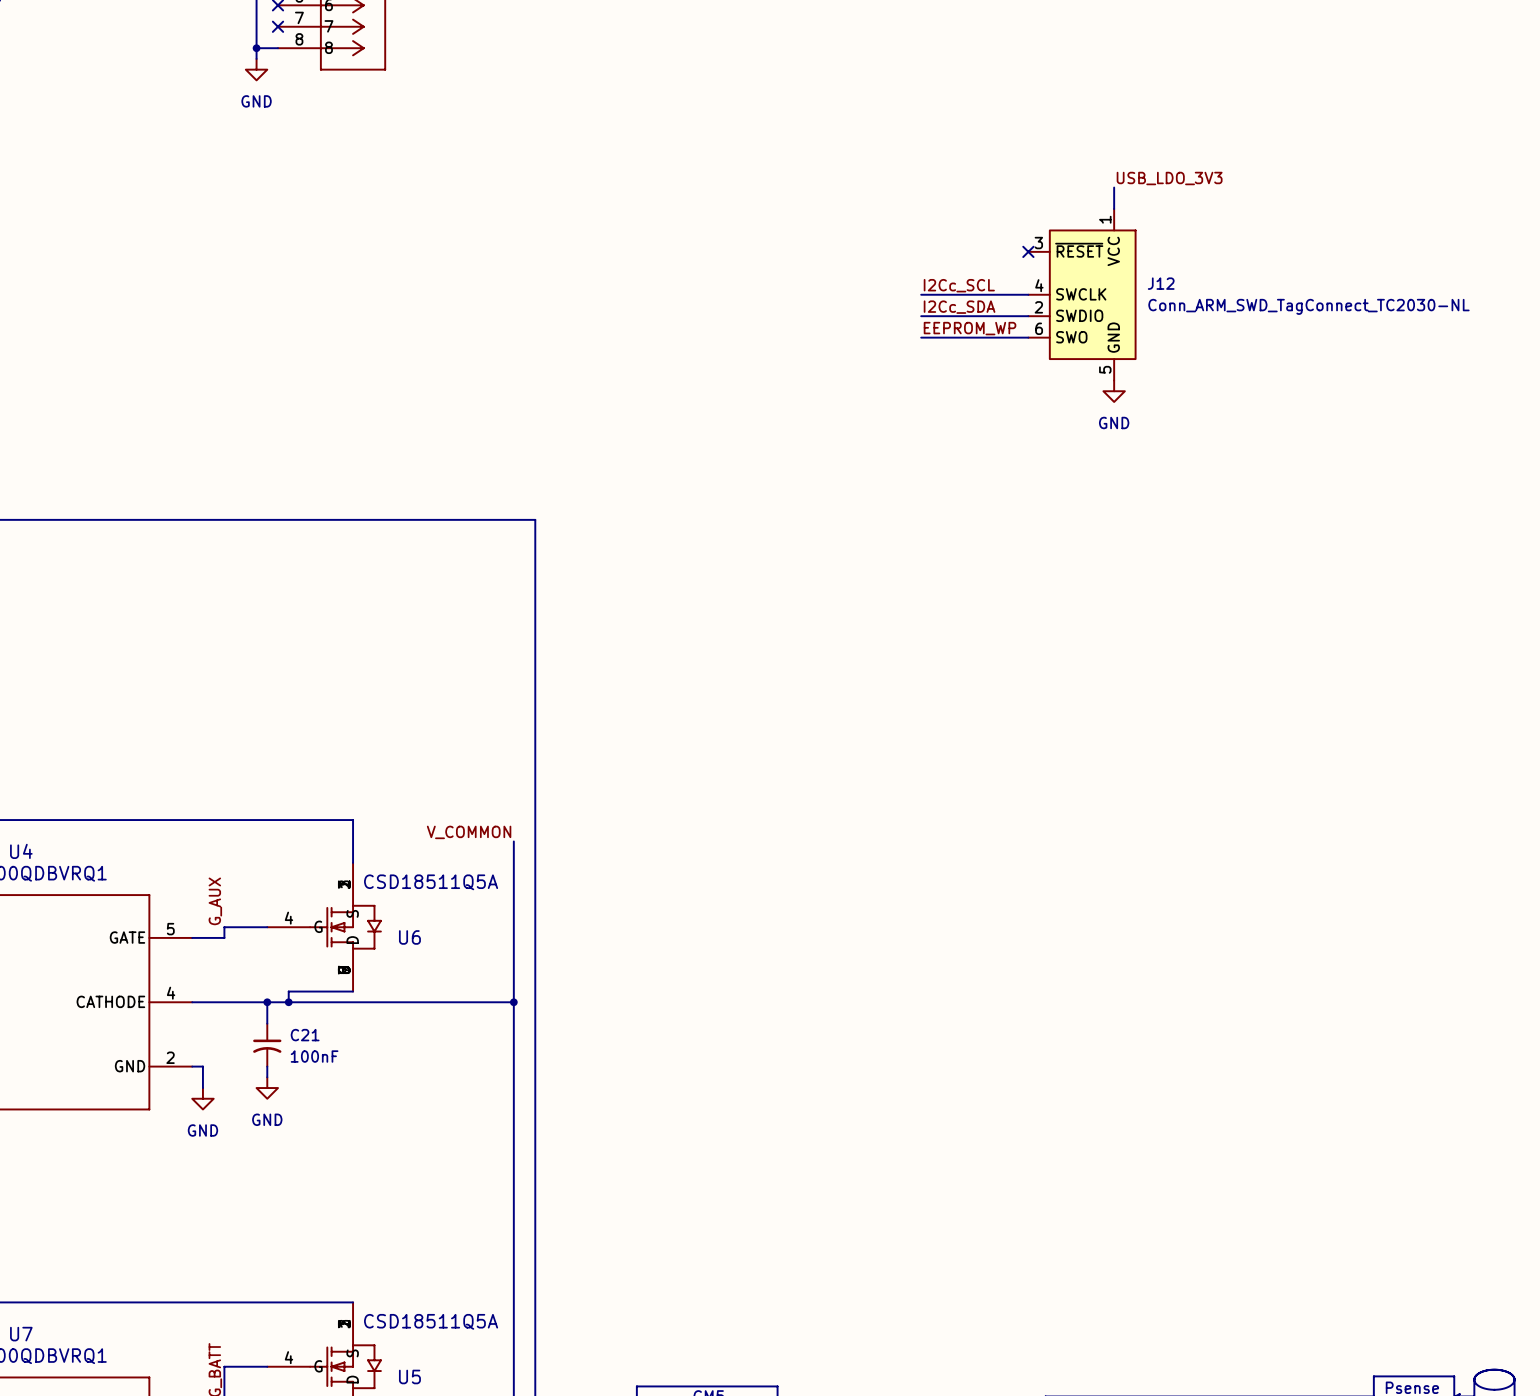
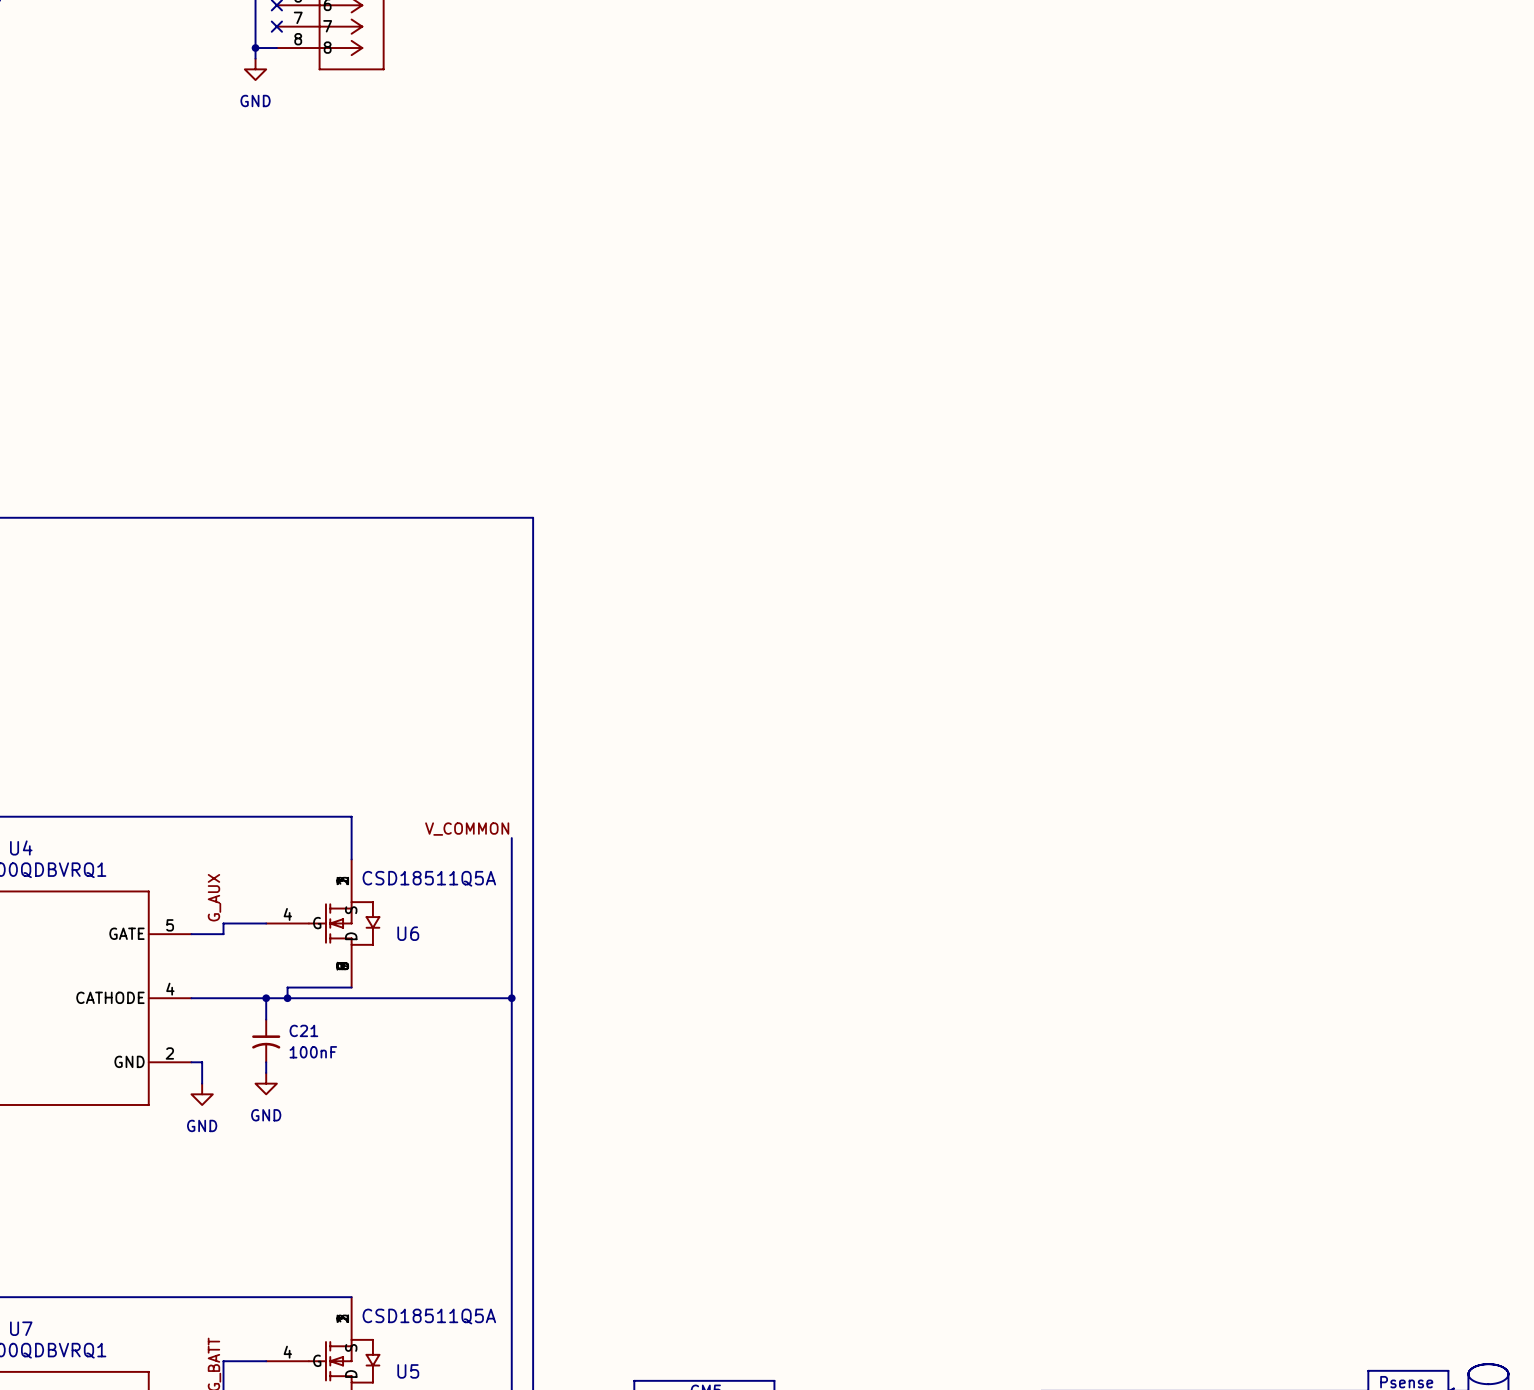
label: USB_LDO_3V3 (1169, 178) -> none
wire: (1114, 187) (1114, 209) -> none
no-connect mark: (1028, 251) -> none
label: I2Cc_SCL (959, 285) -> none
wire: (921, 294) (1028, 294) -> none
J12: Conn_ARM_SWD_TagConnect_TC2030-NL (1081, 294) -> none
label: I2Cc_SDA (959, 307) -> none
wire: (921, 316) (1028, 316) -> none
label: EEPROM_WP (970, 328) -> none
wire: (921, 337) (1028, 337) -> none
power symbol: GND (1114, 391) -> none

